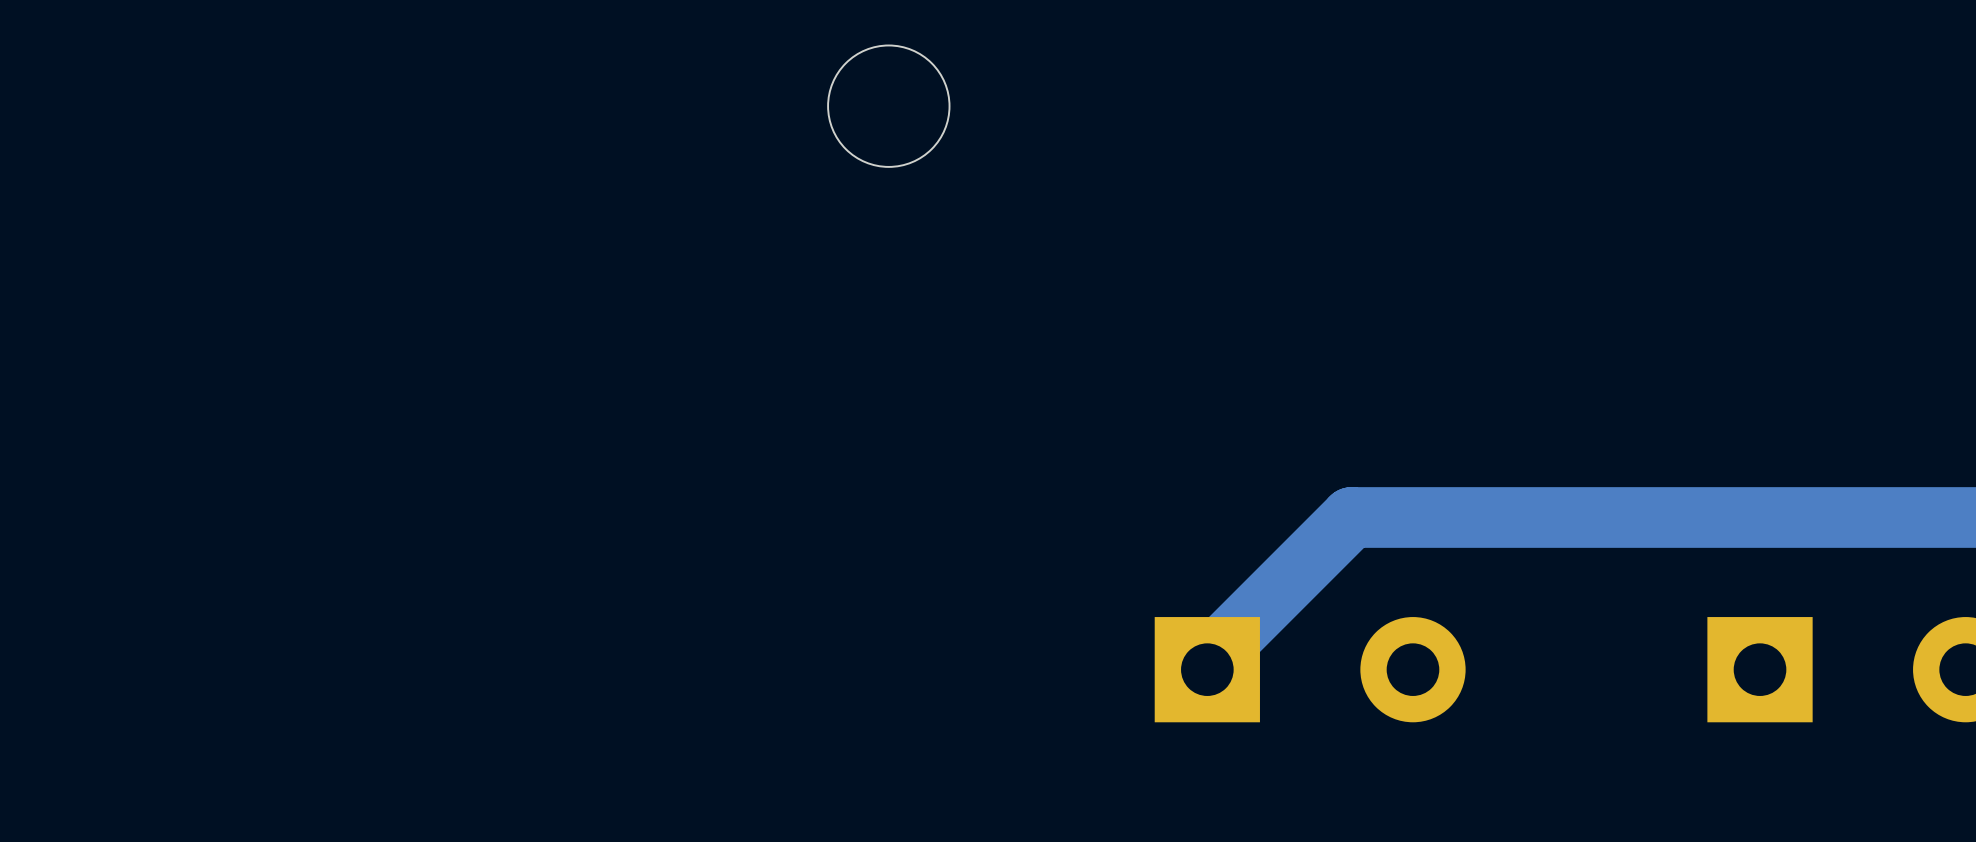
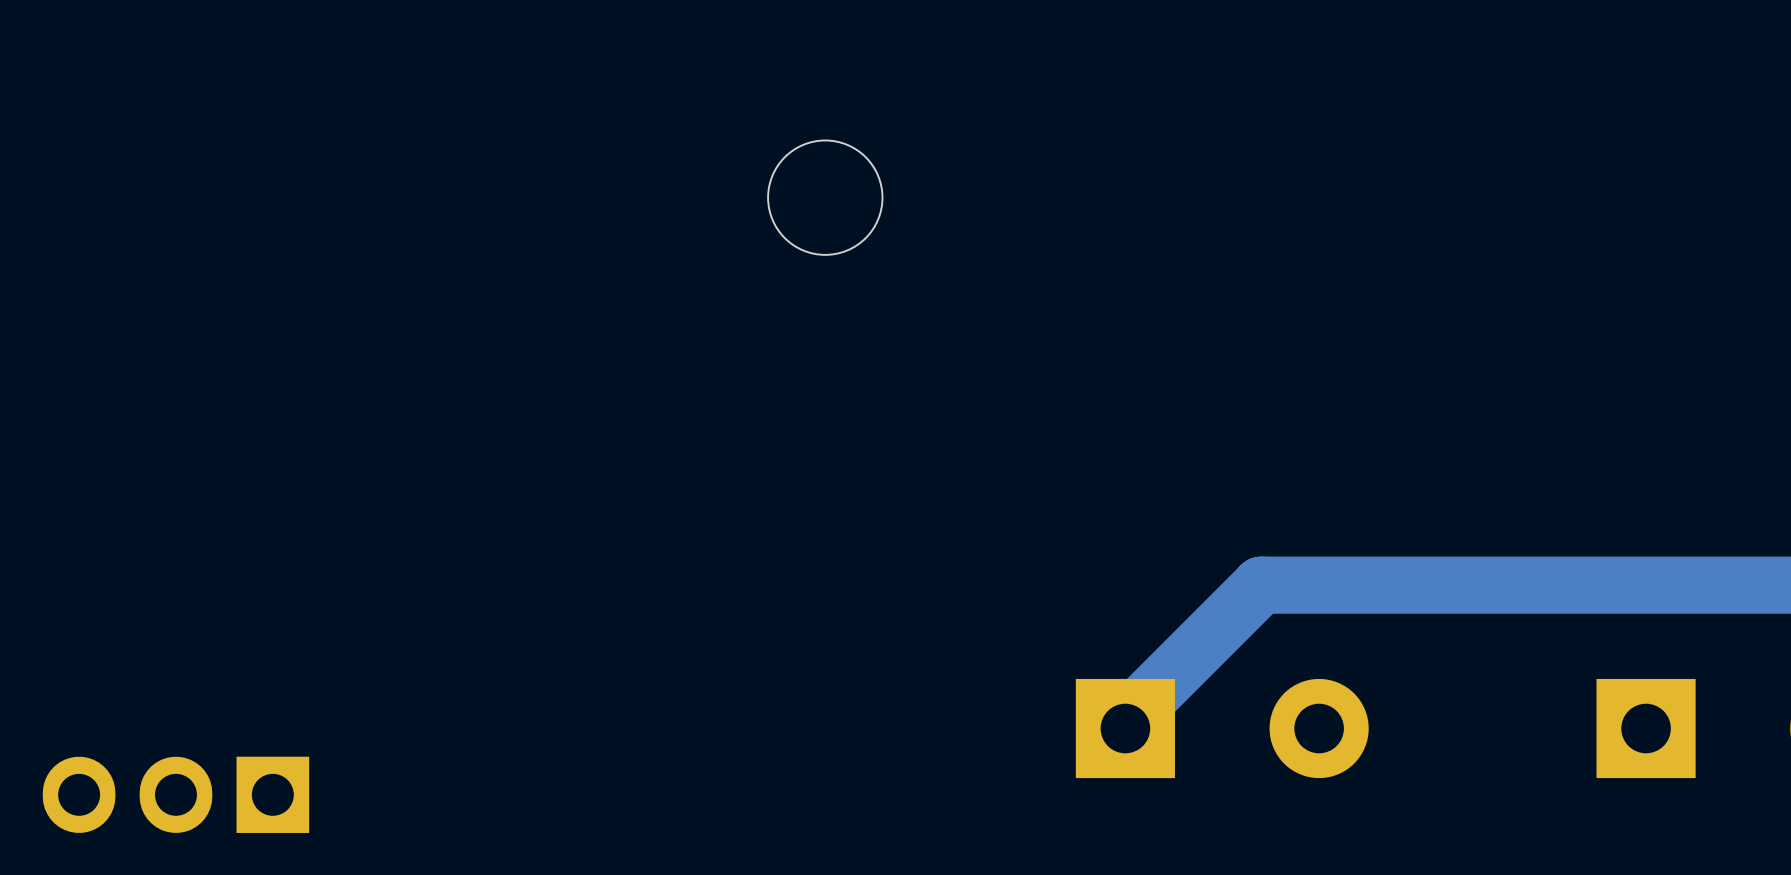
part: none -> (175, 794)

